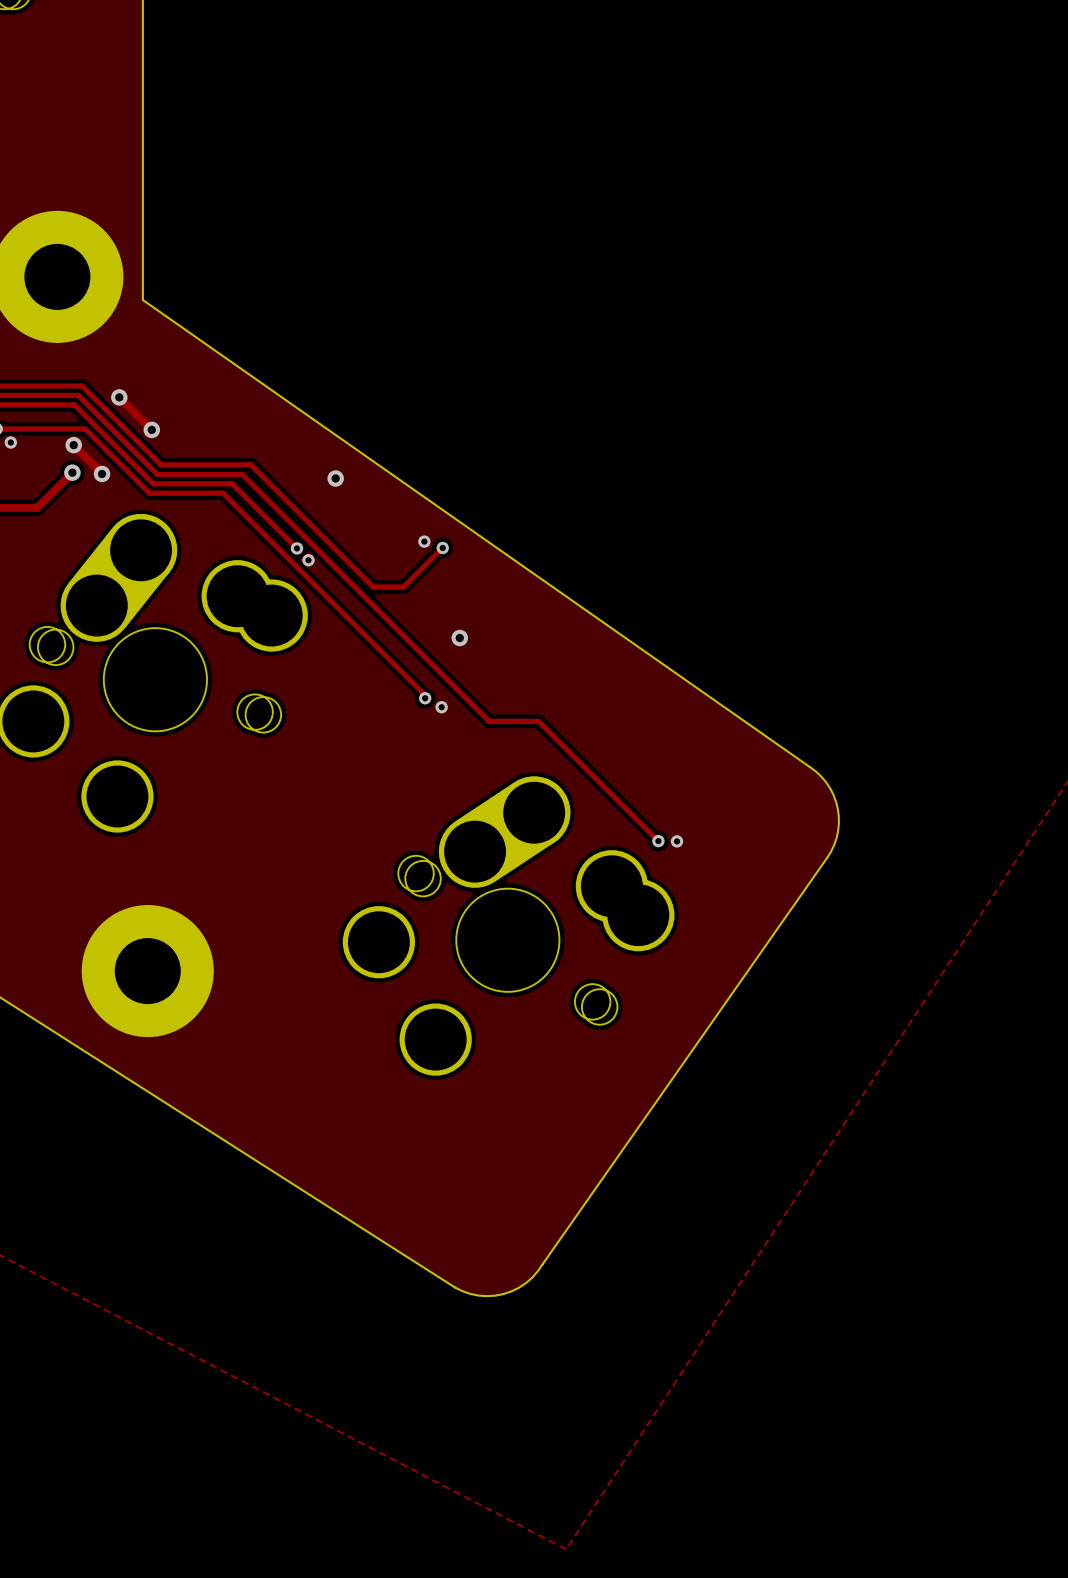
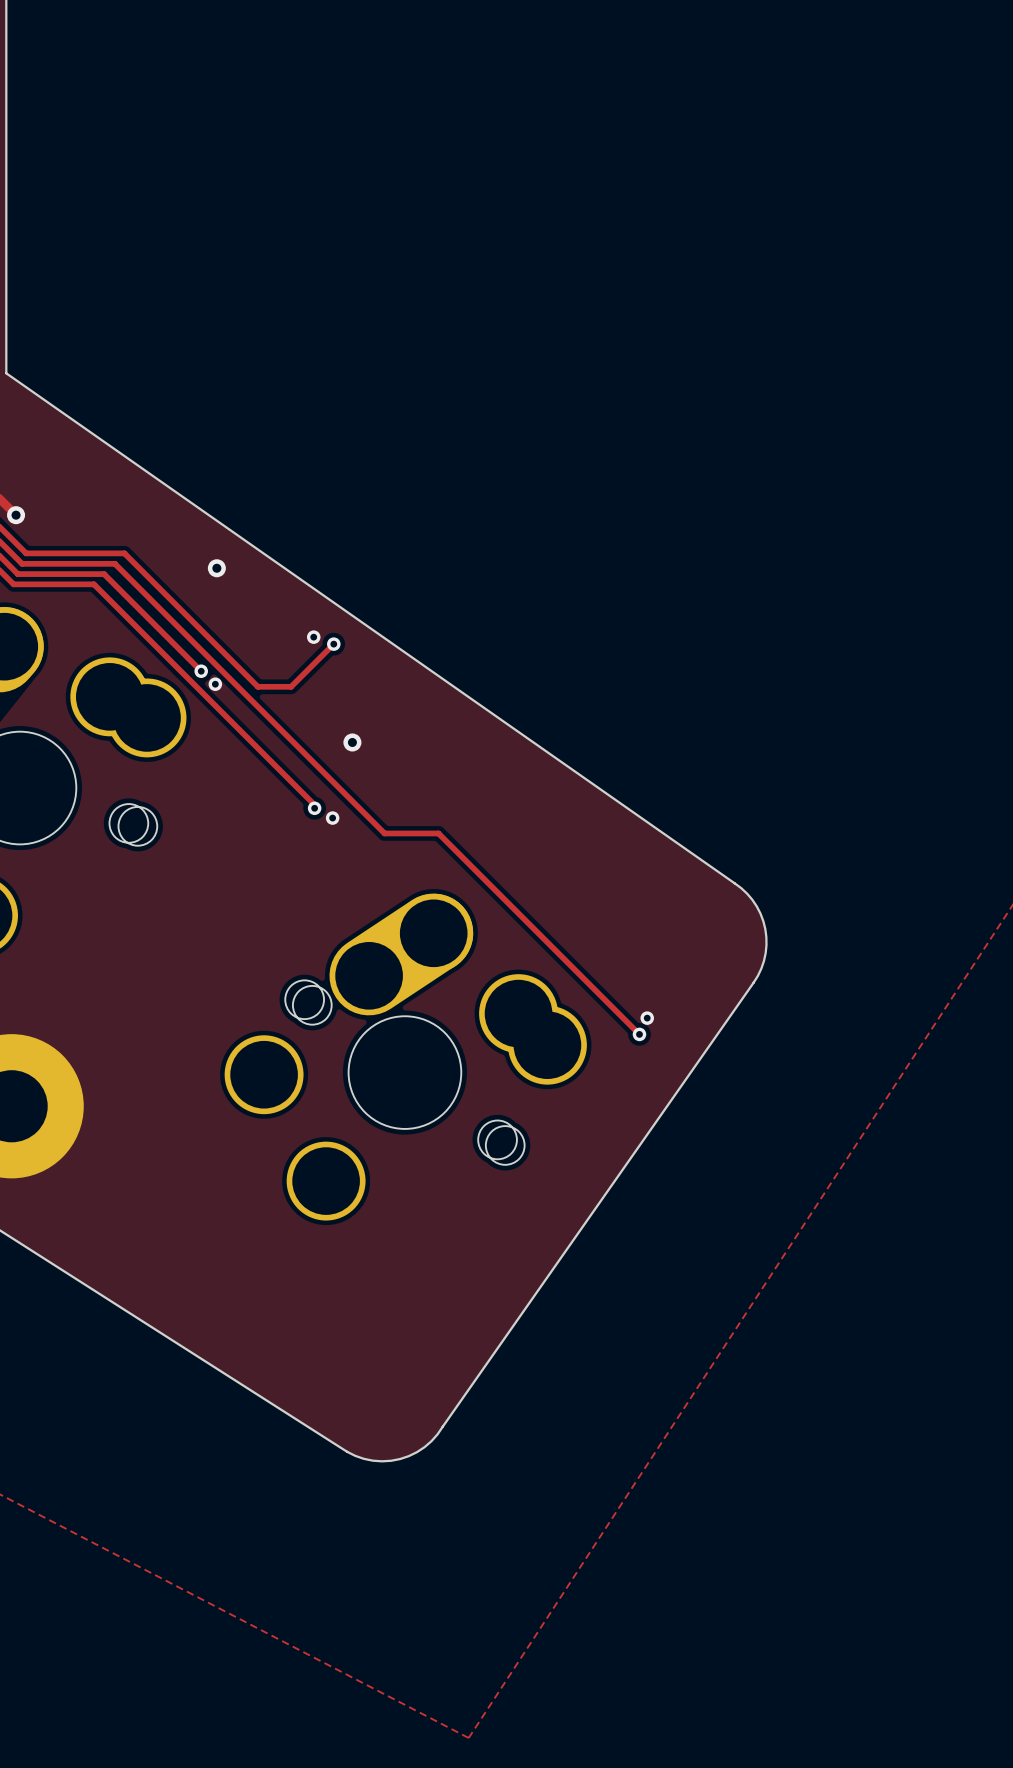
track: none -> (174, 644) (201, 671)
via: (296, 548) -> none
via: (308, 560) -> none
via: none -> (201, 671)
via: none -> (215, 684)
track: none -> (569, 964) (639, 1034)
via: (658, 841) -> none
via: (677, 841) -> none
via: none -> (647, 1018)
via: none -> (639, 1034)

